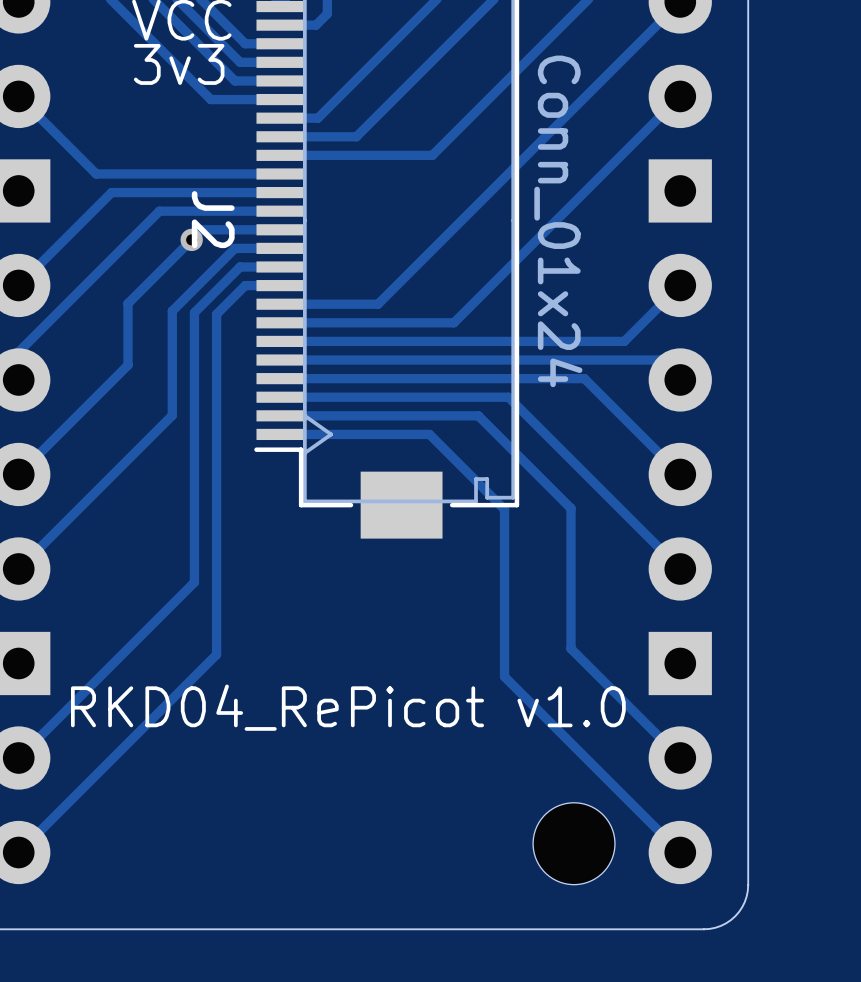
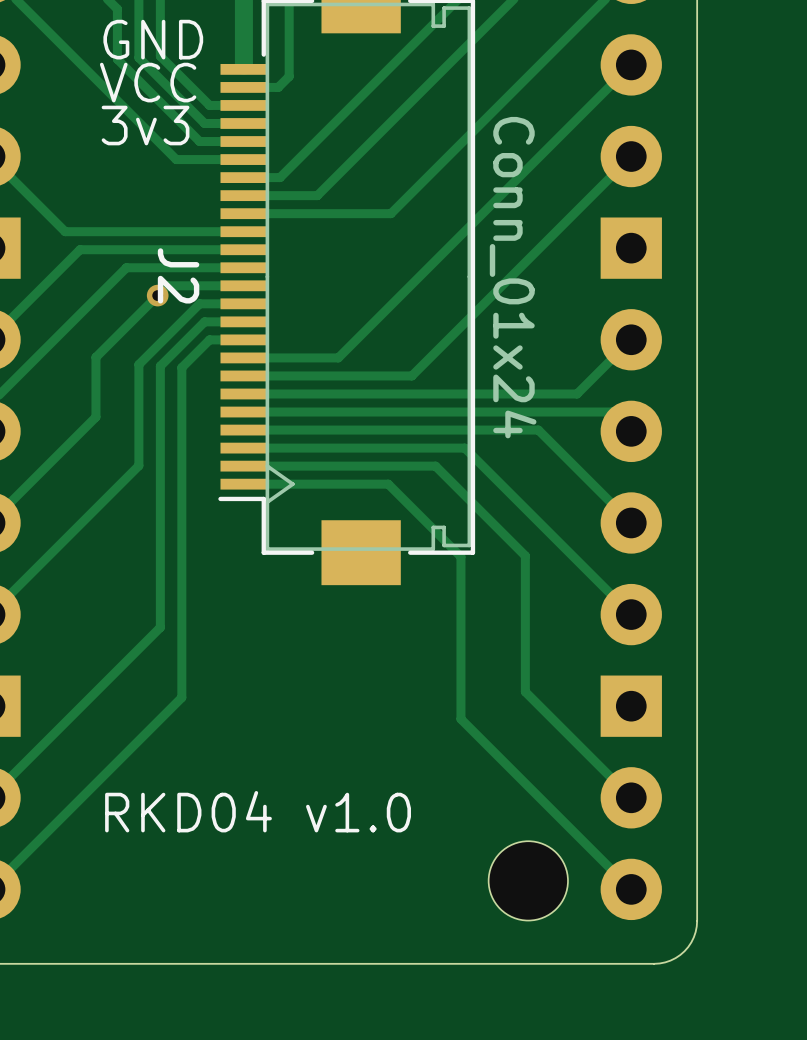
text: RKD04_RePicot v1.0 (348, 707) -> RKD04 v1.0 (258, 811)

